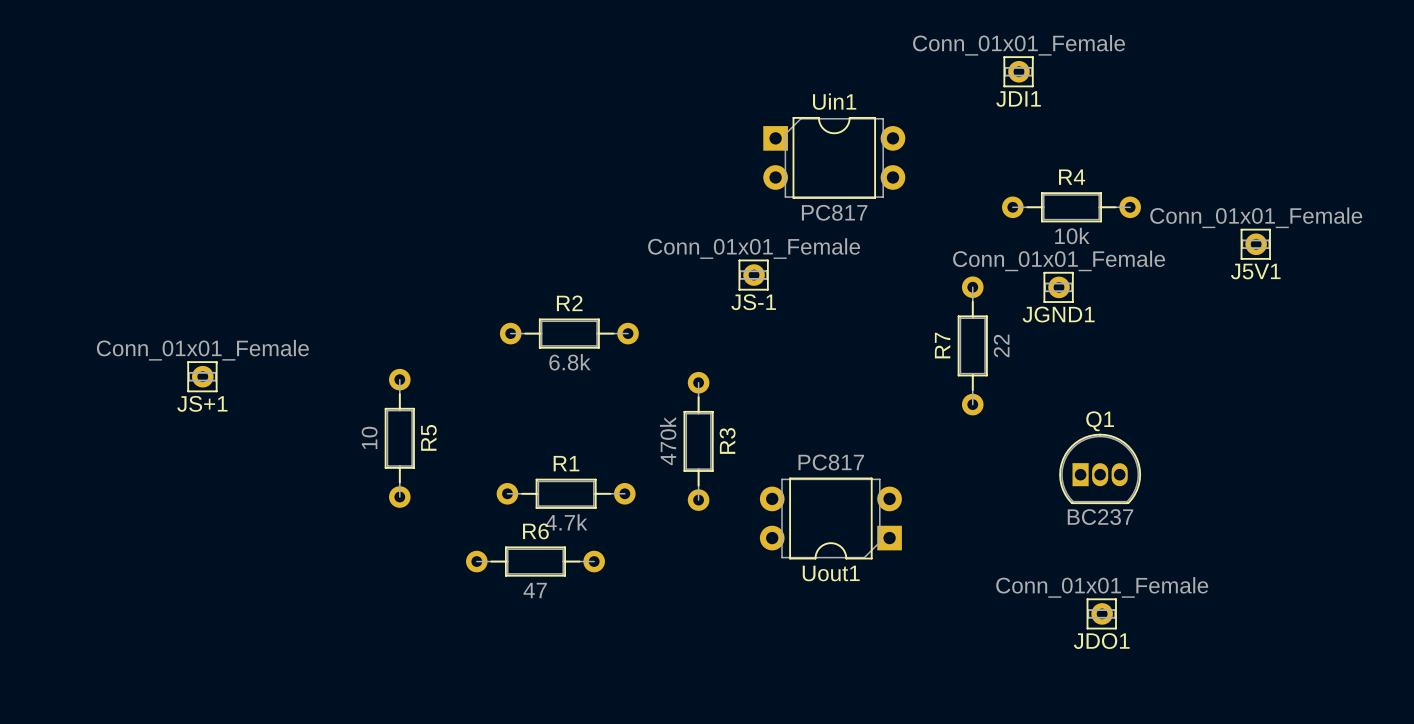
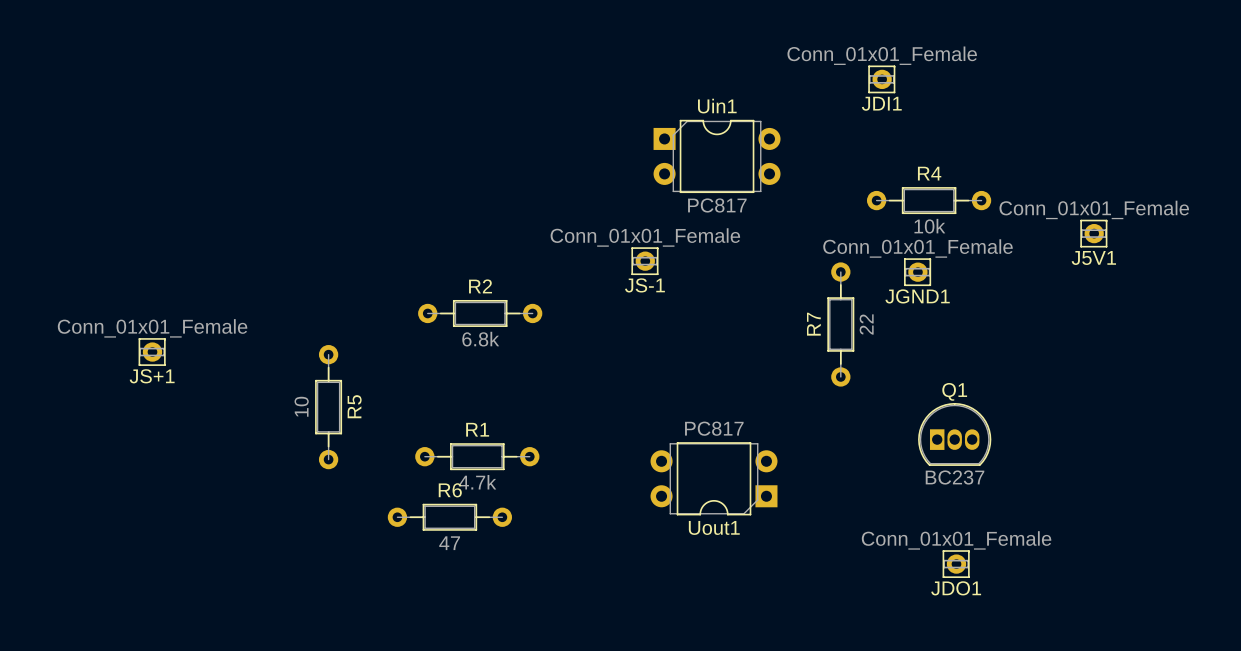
R3: 470k (698, 441) -> none

